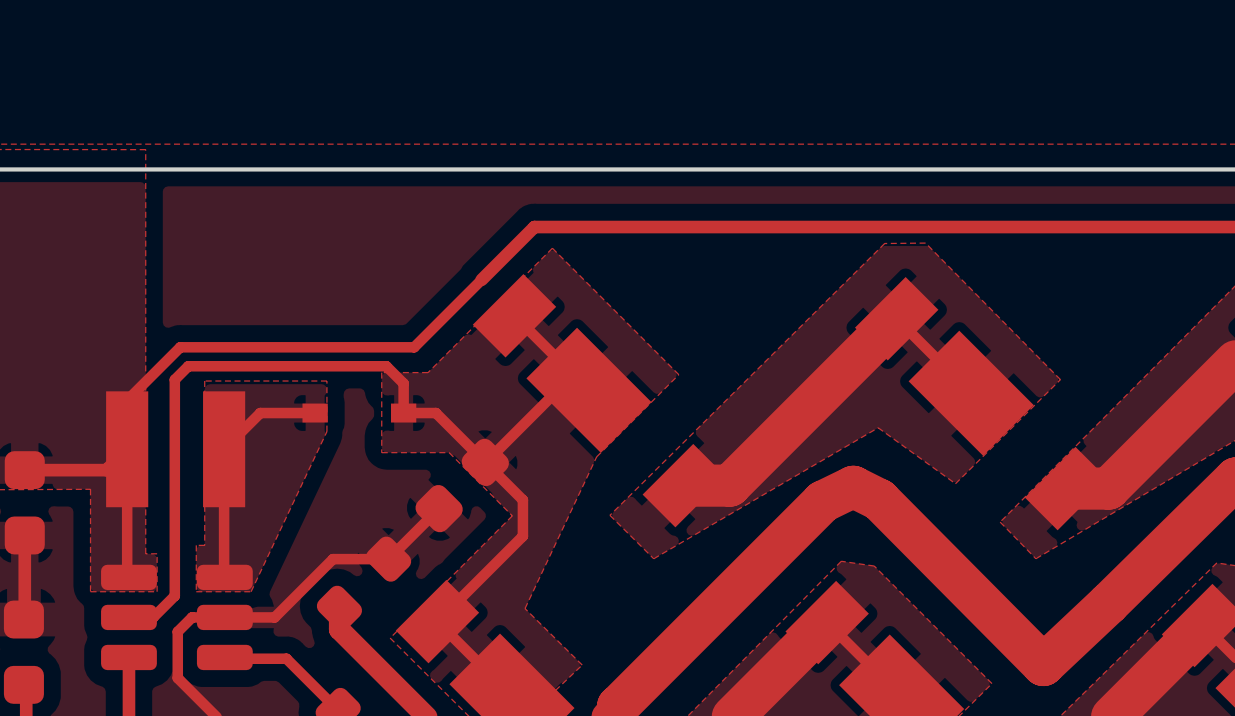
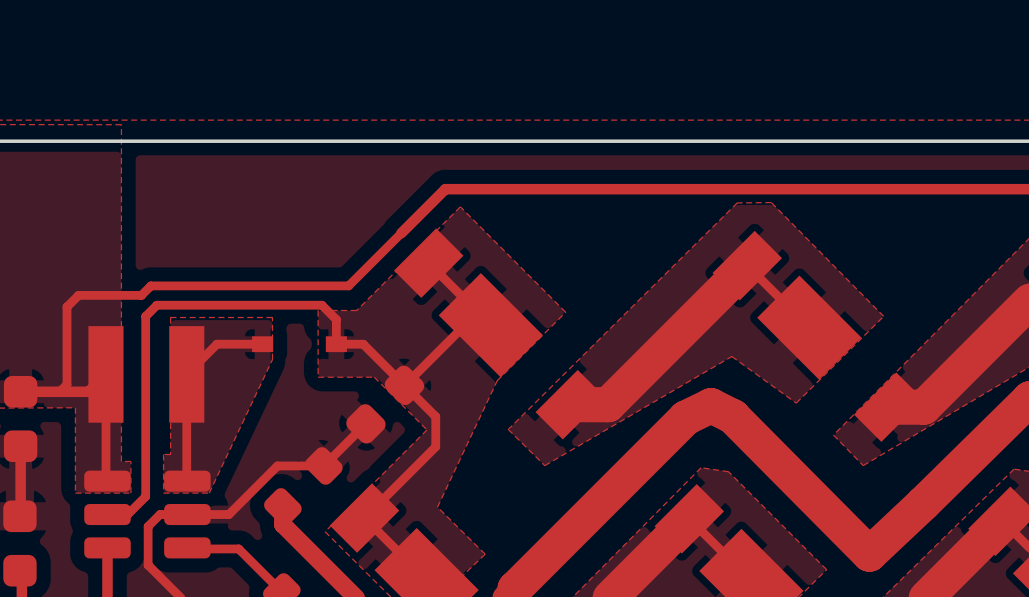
top track: (418, 343) (414, 347) (180, 347) (127, 400) (127, 449) -> (348, 285) (150, 285) (141, 295) (78, 295) (67, 306) (67, 384) (59, 391)

